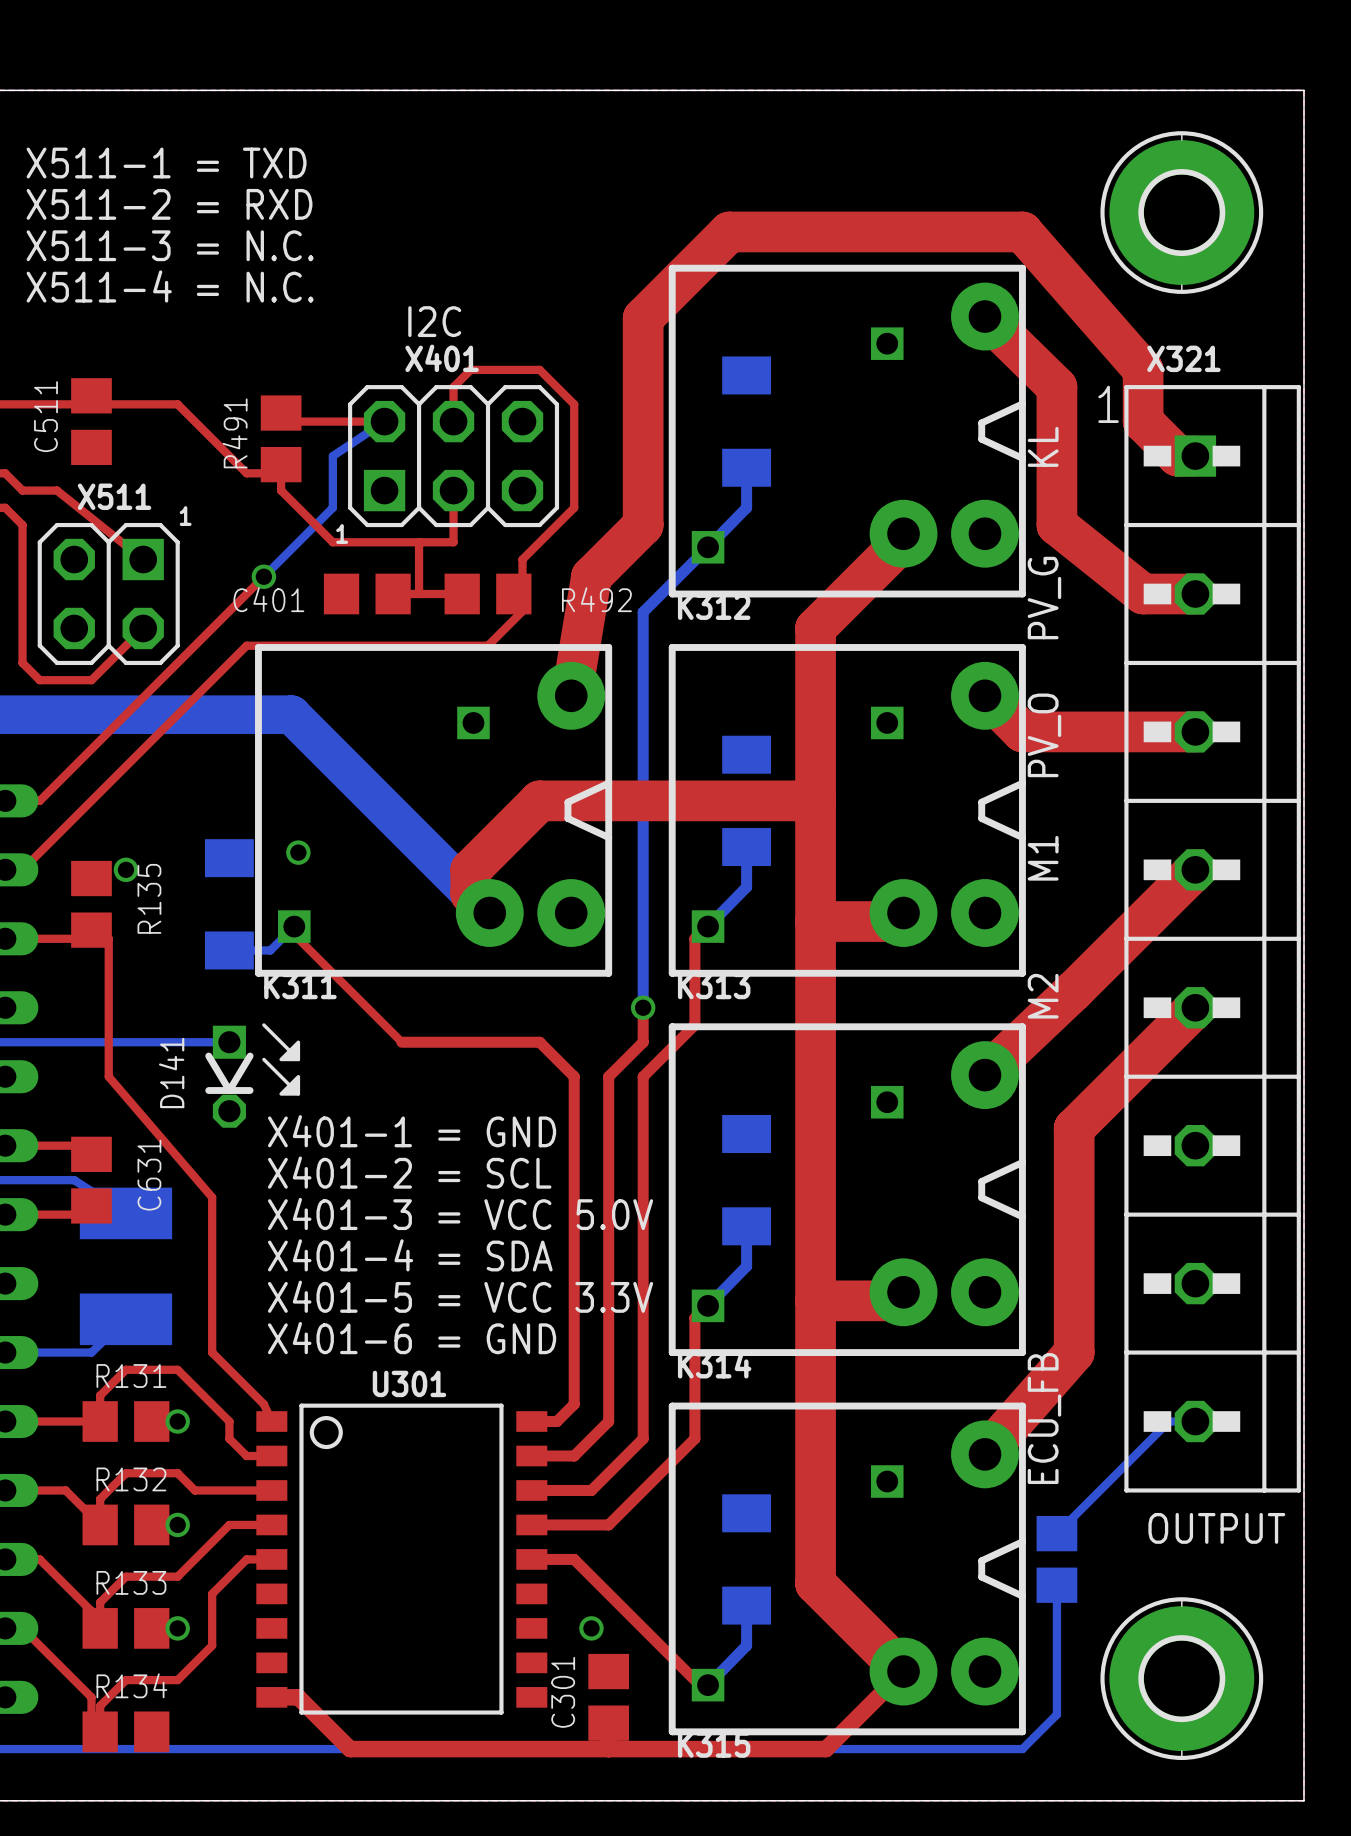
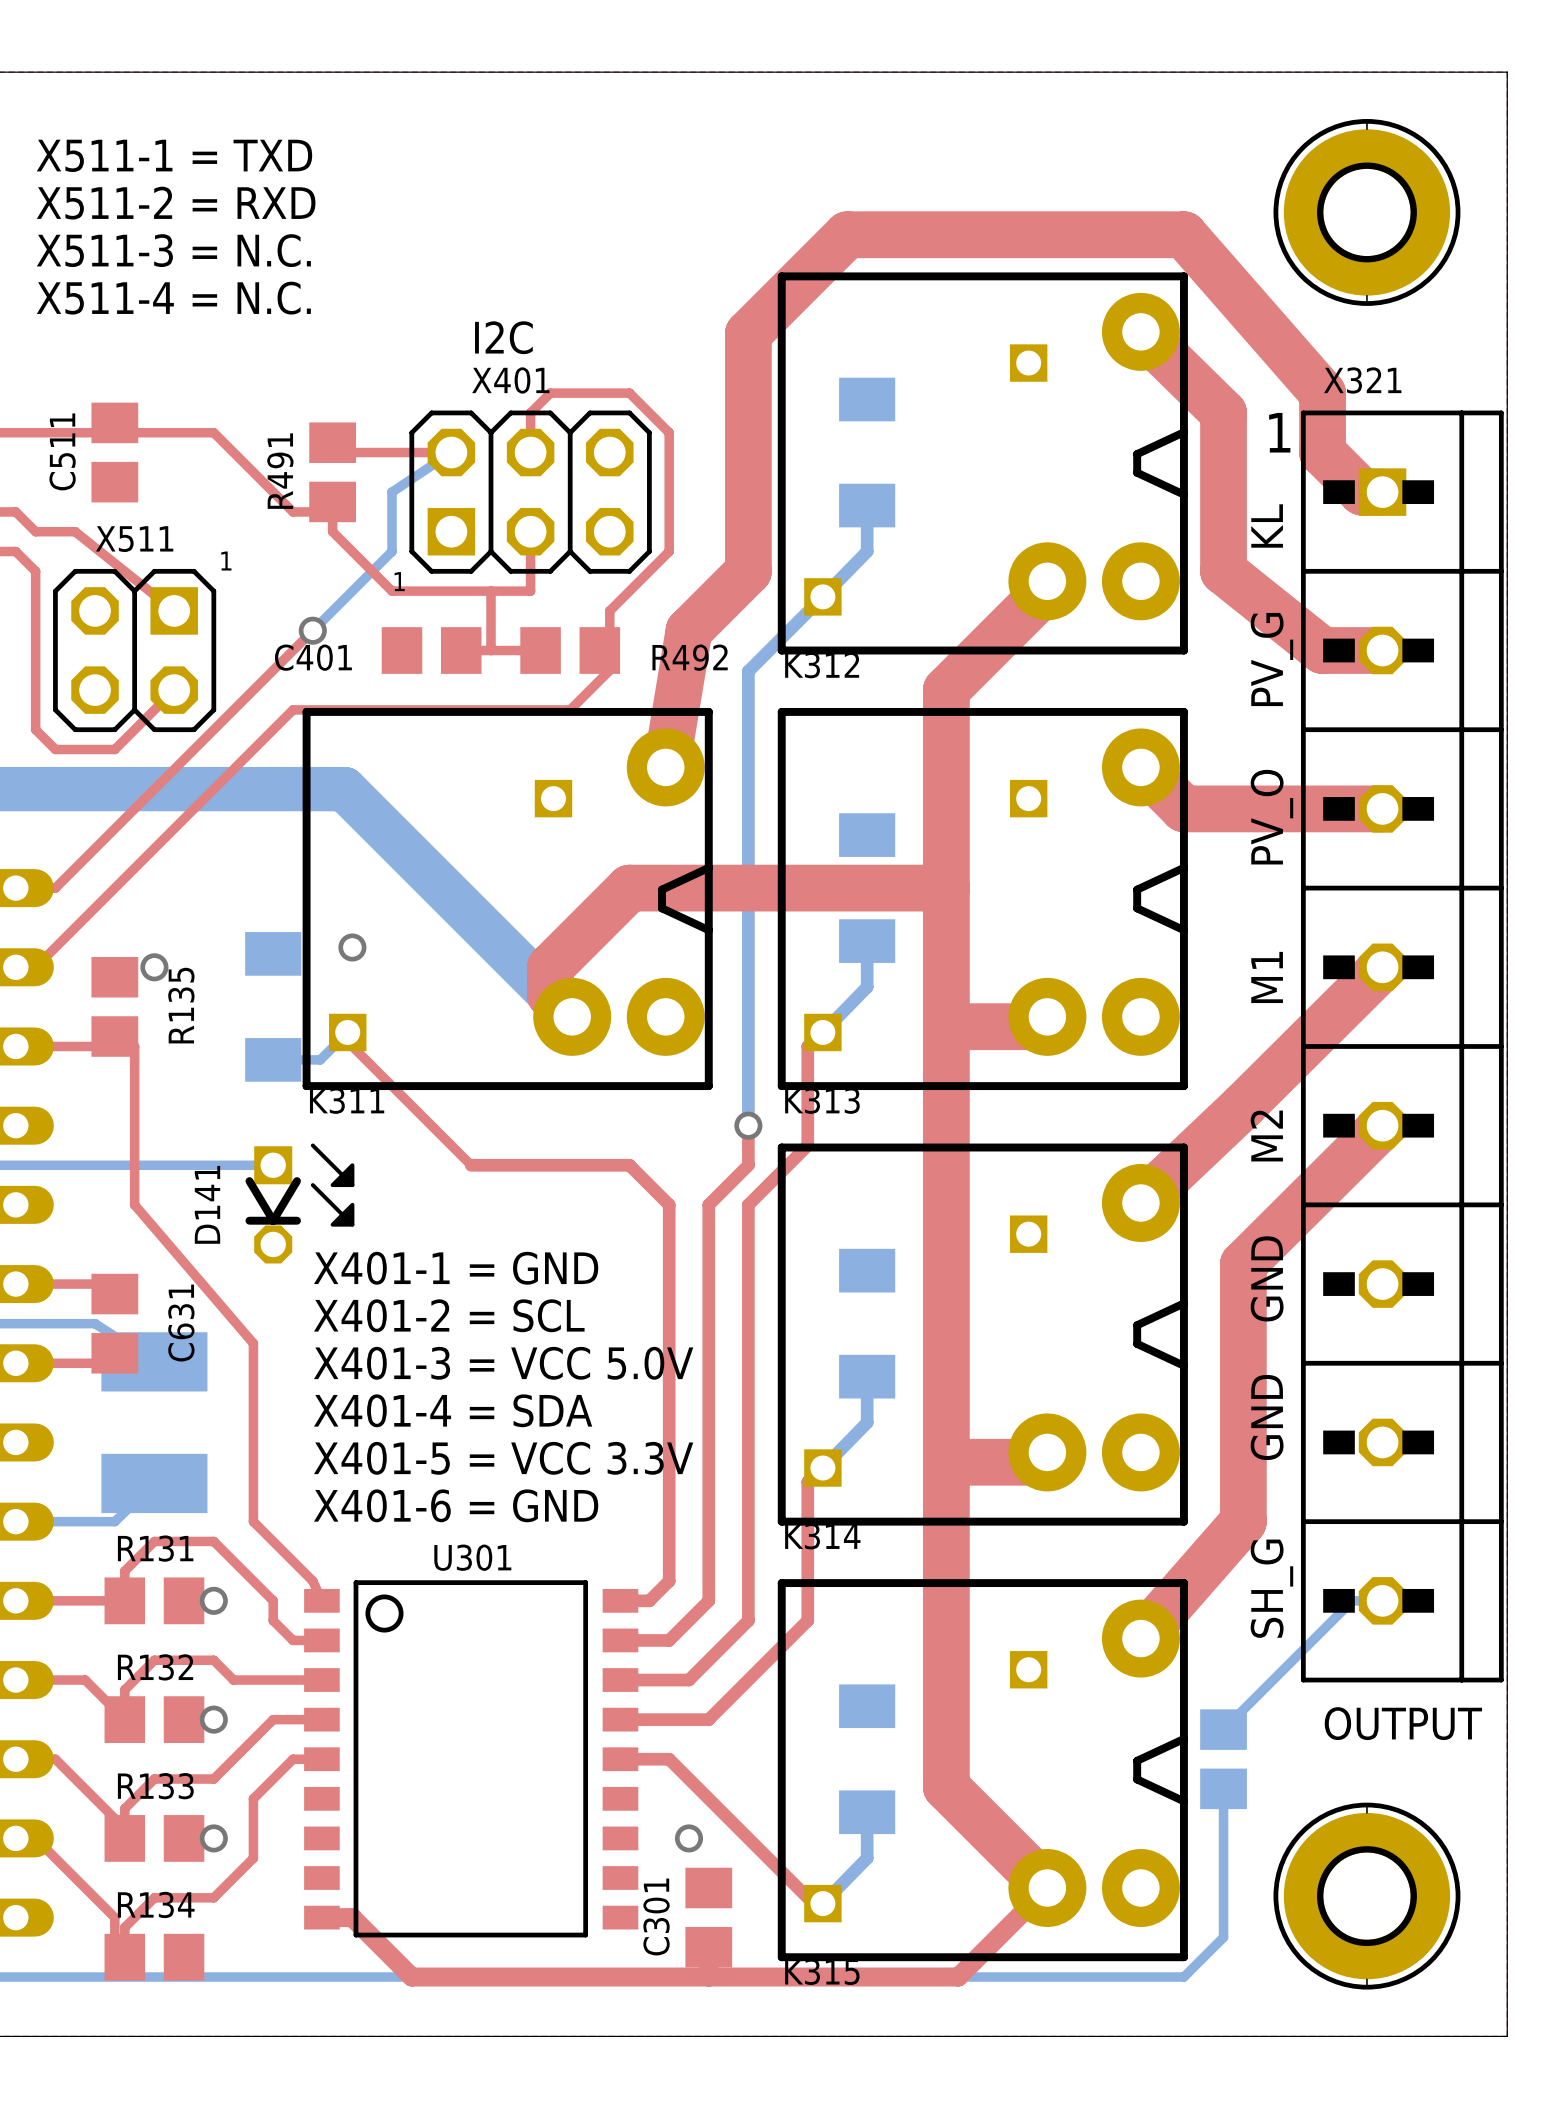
text position: KL (1043, 446) -> KL (1267, 526)
text position: PV_G (1044, 598) -> PV_G (1271, 659)
text position: PV_O (1044, 735) -> PV_O (1271, 817)
text position: M1 (1043, 858) -> M1 (1267, 977)
text position: M2 (1043, 996) -> M2 (1266, 1136)
text: none -> GND (1267, 1278)
text: none -> GND (1267, 1417)
text: none -> SH_G (1271, 1588)
text: ECU_FB (1044, 1418) -> none

